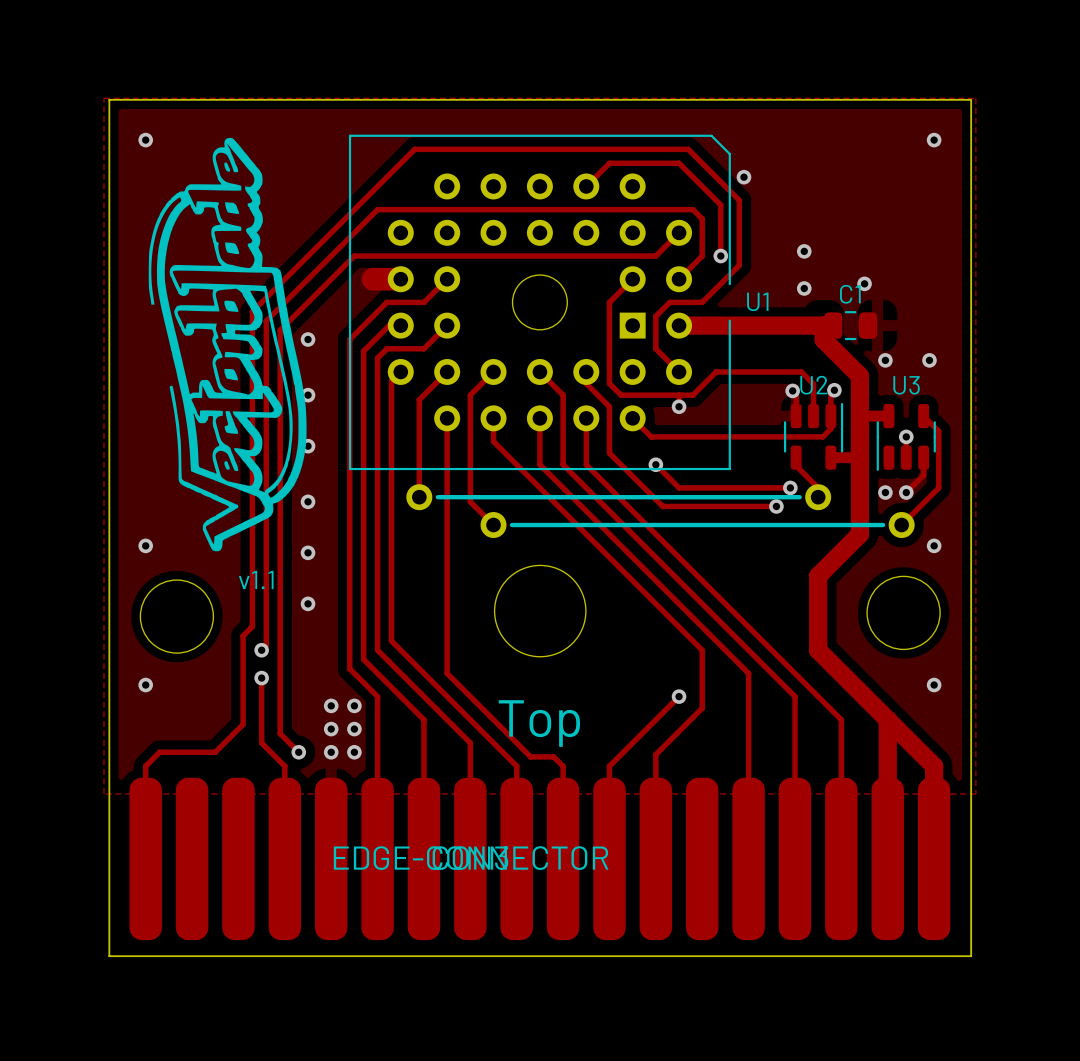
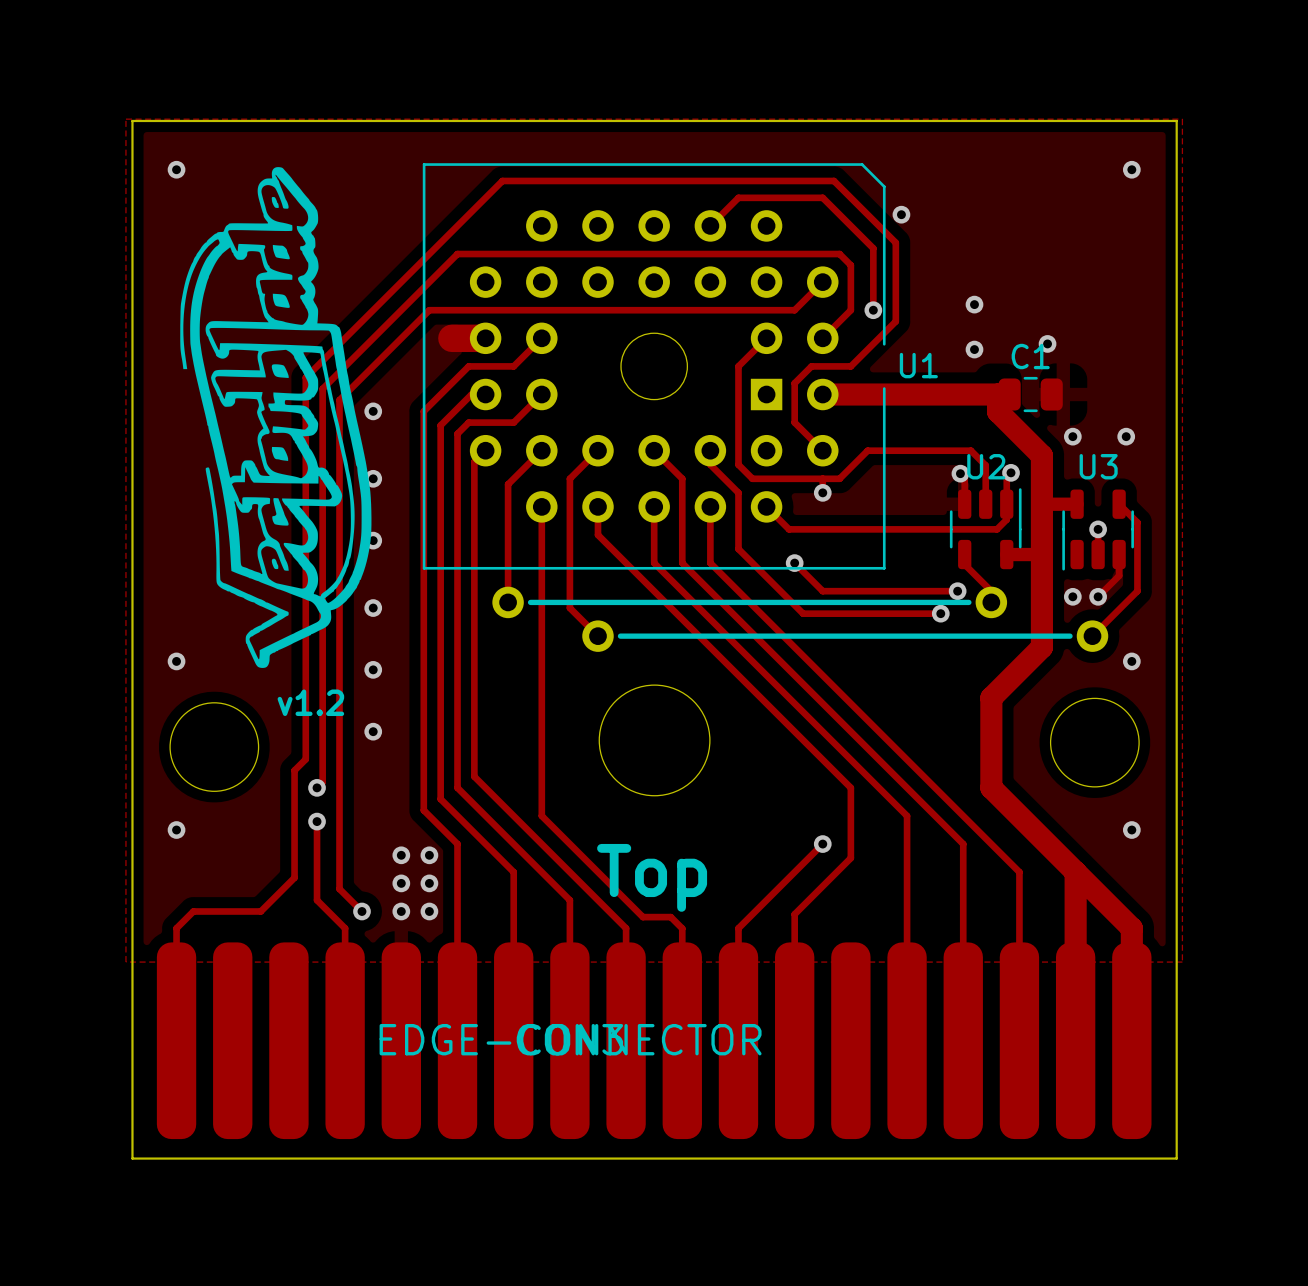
text: v1.1 (256, 580) -> v1.2 (310, 702)

